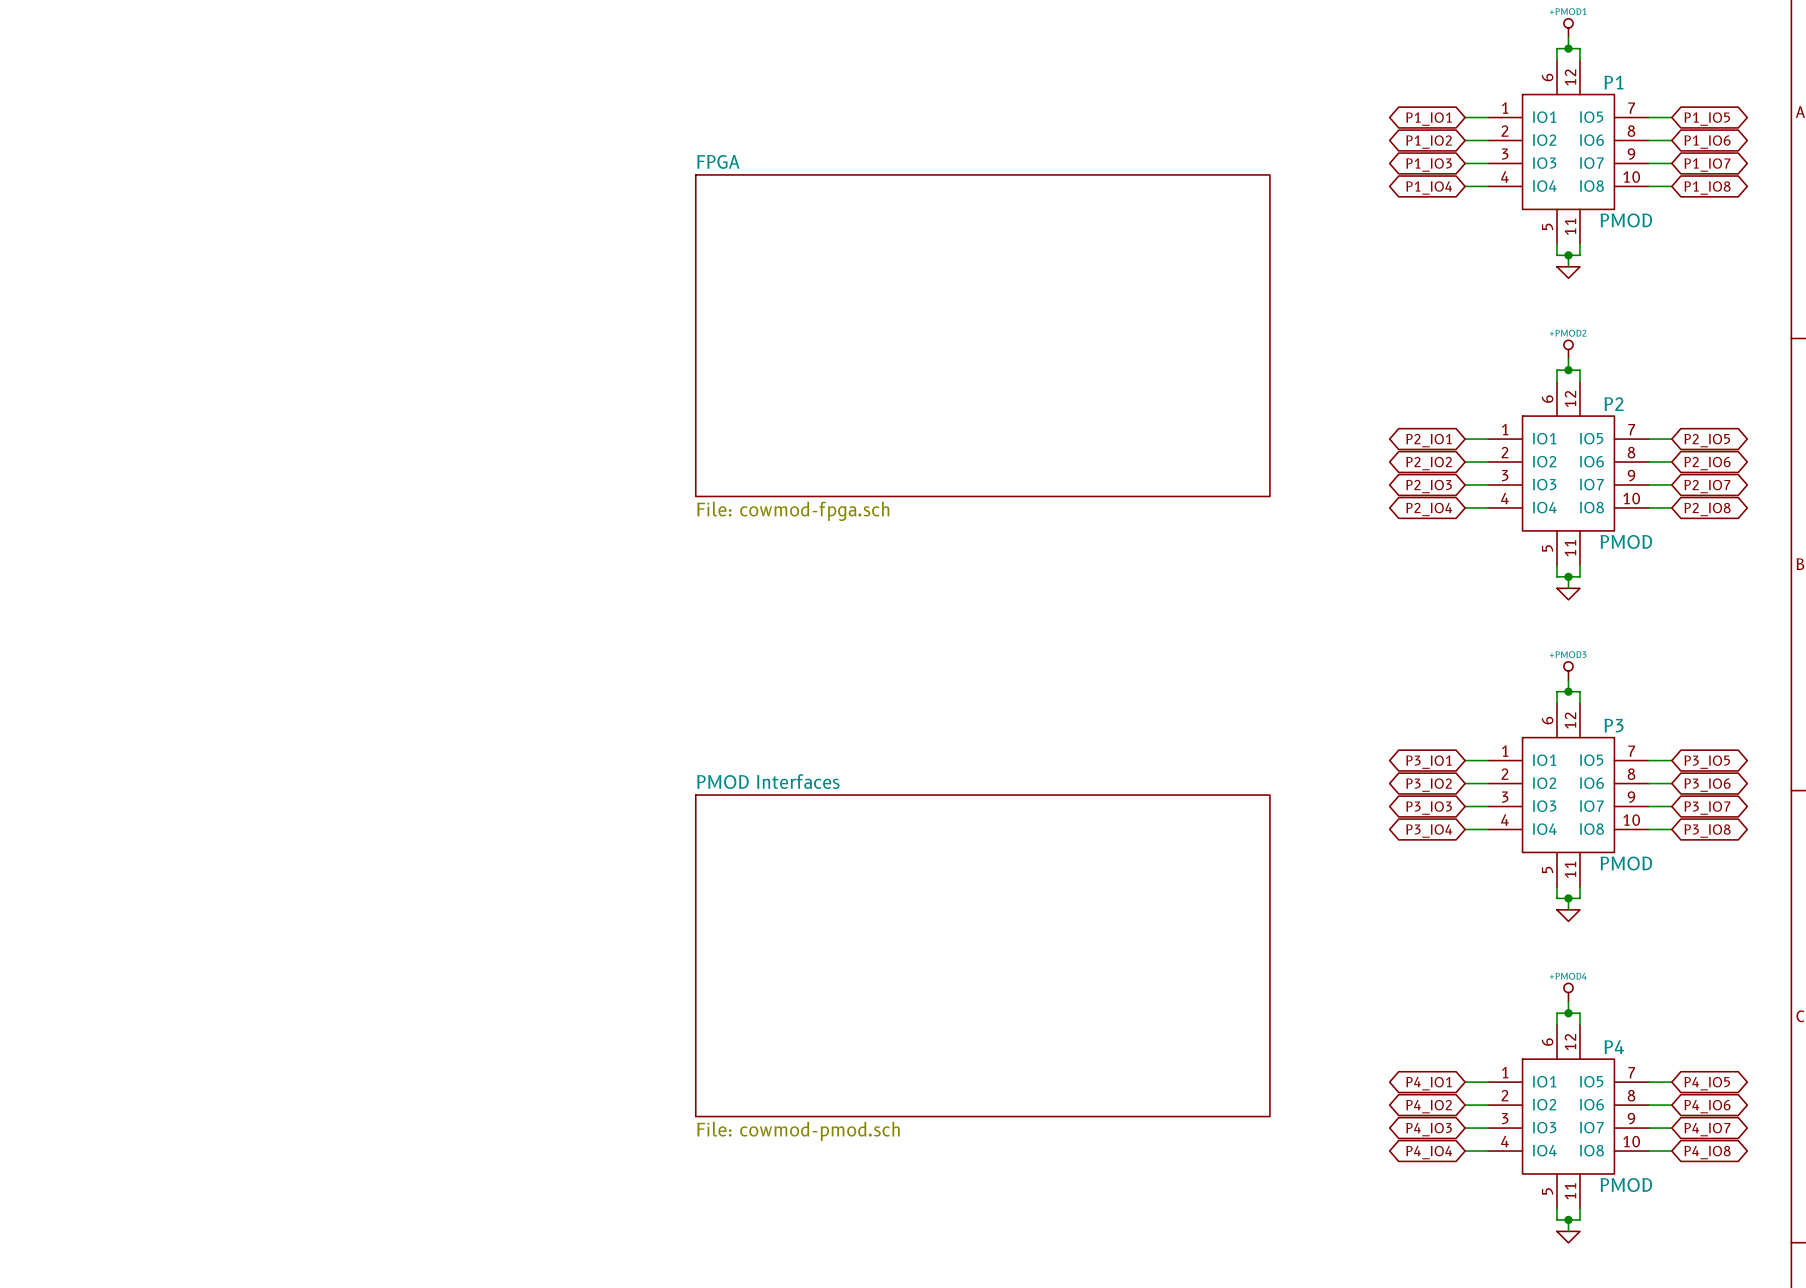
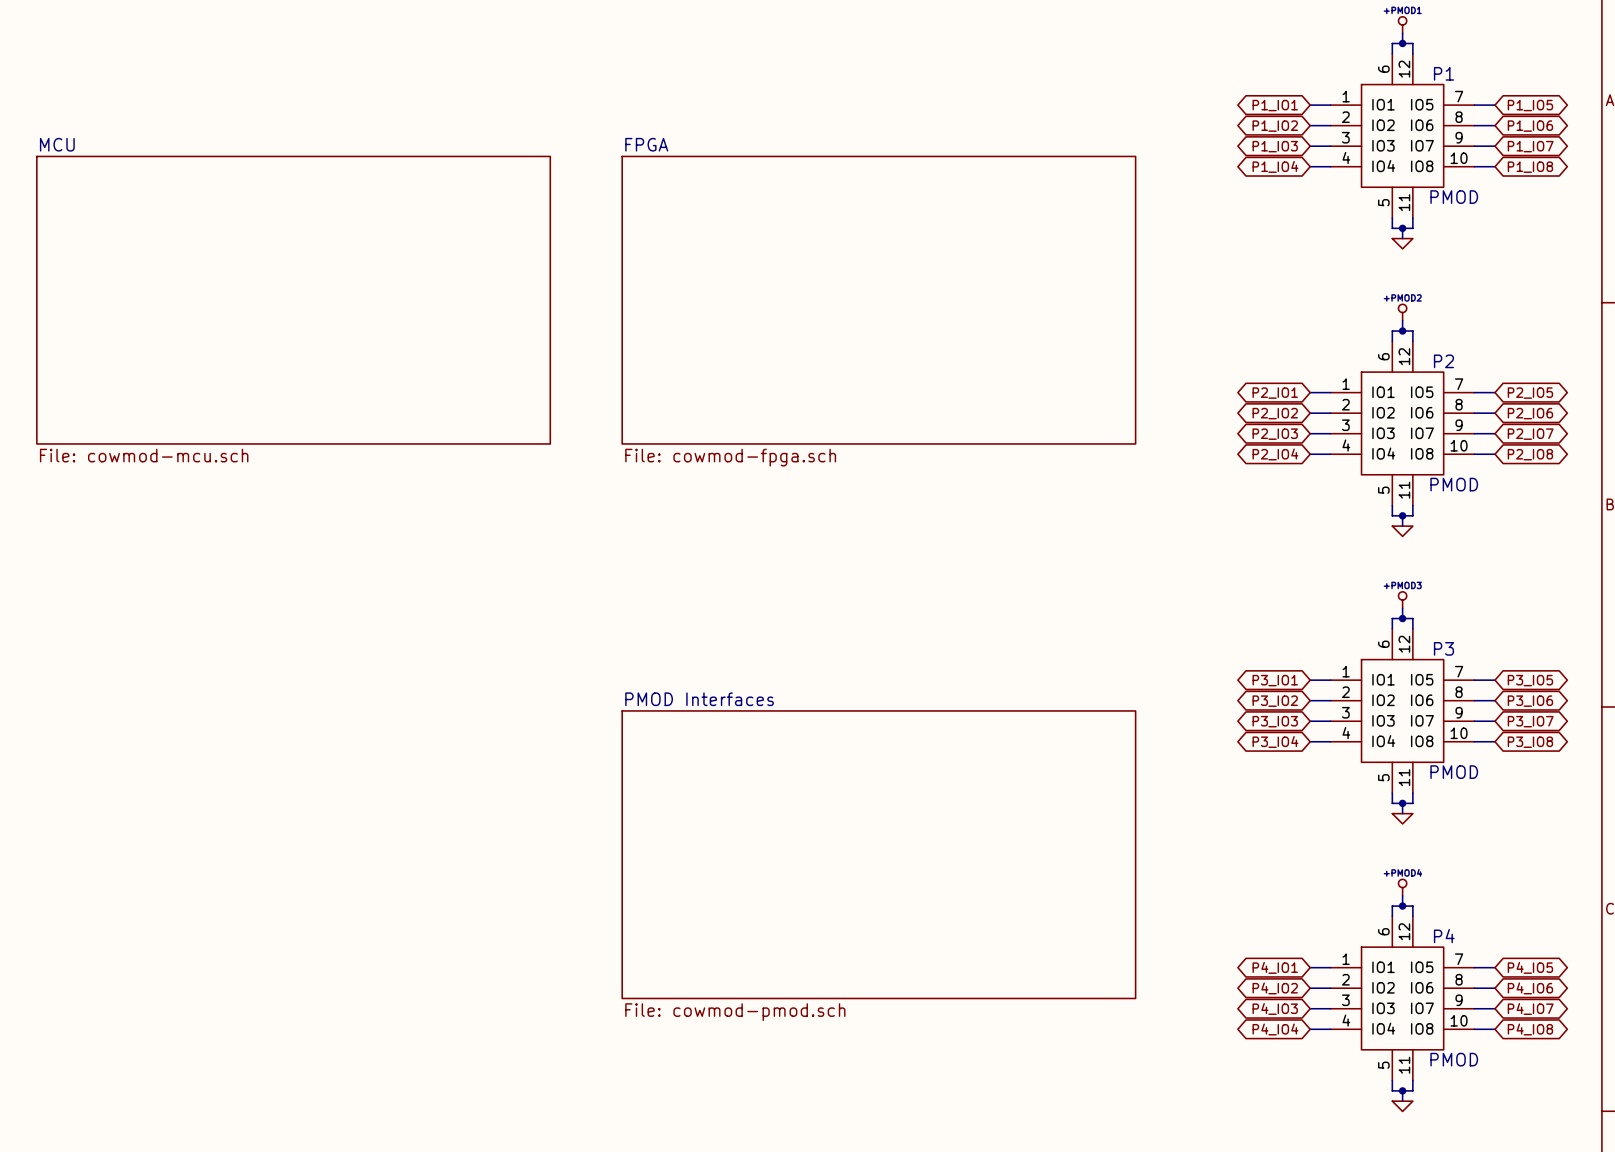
sheet MCU: none -> File: cowmod-mcu.sch (293, 300)

